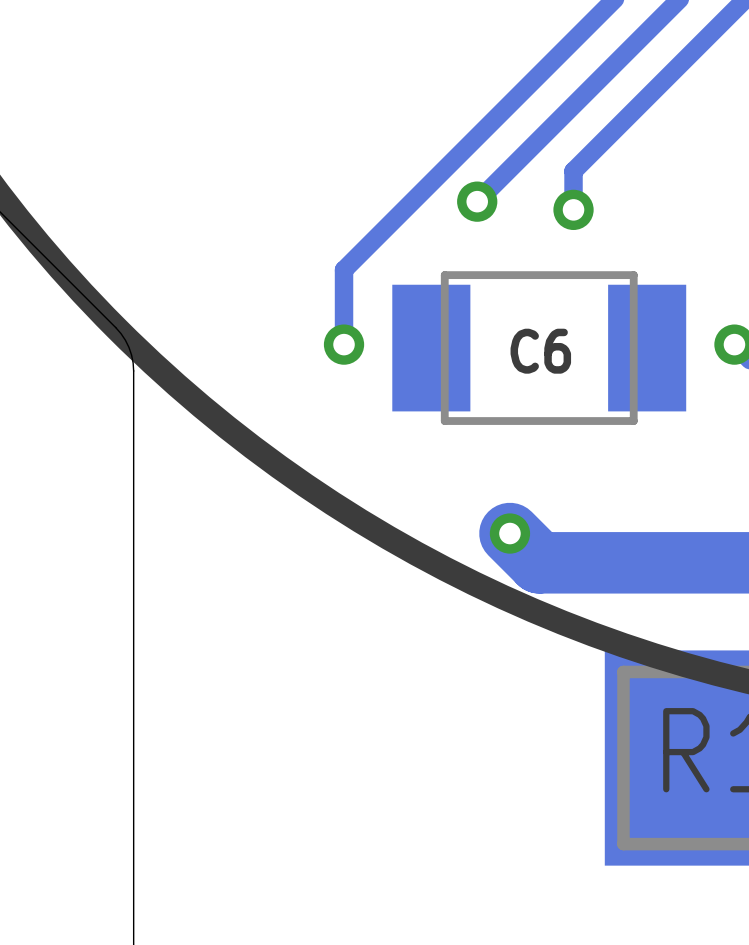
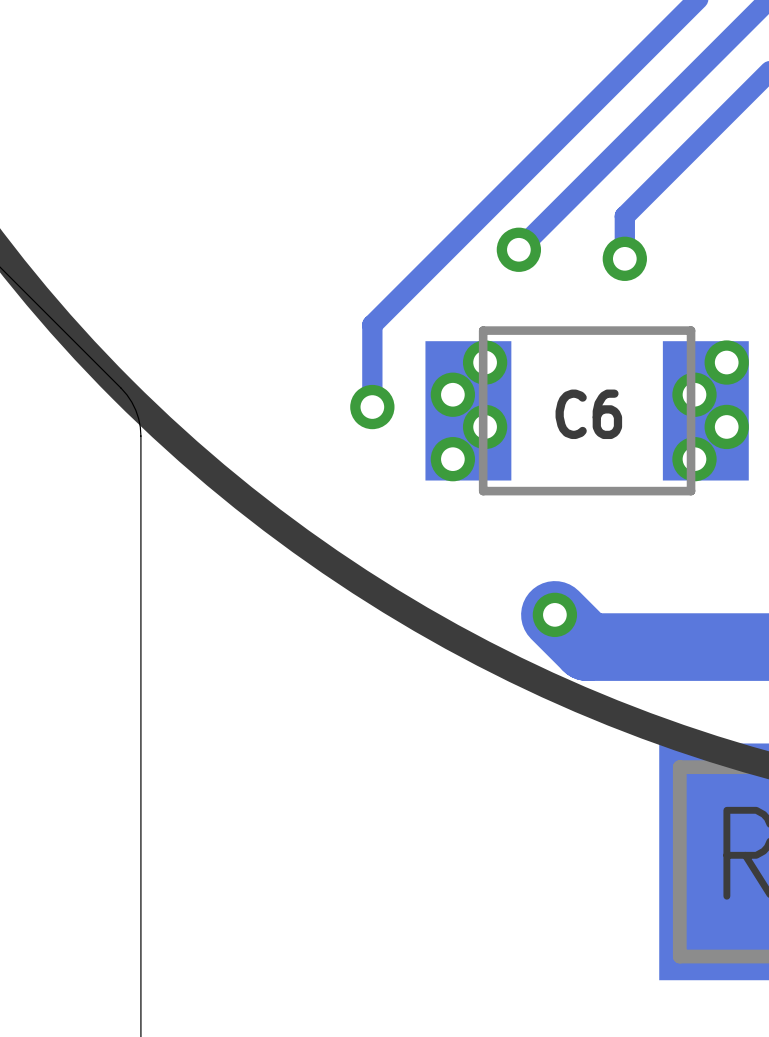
via: none -> (485, 362)
via: none -> (726, 362)
via: none -> (452, 394)
via: none -> (694, 394)
via: none -> (485, 426)
via: none -> (726, 426)
via: none -> (452, 459)
via: none -> (694, 459)

